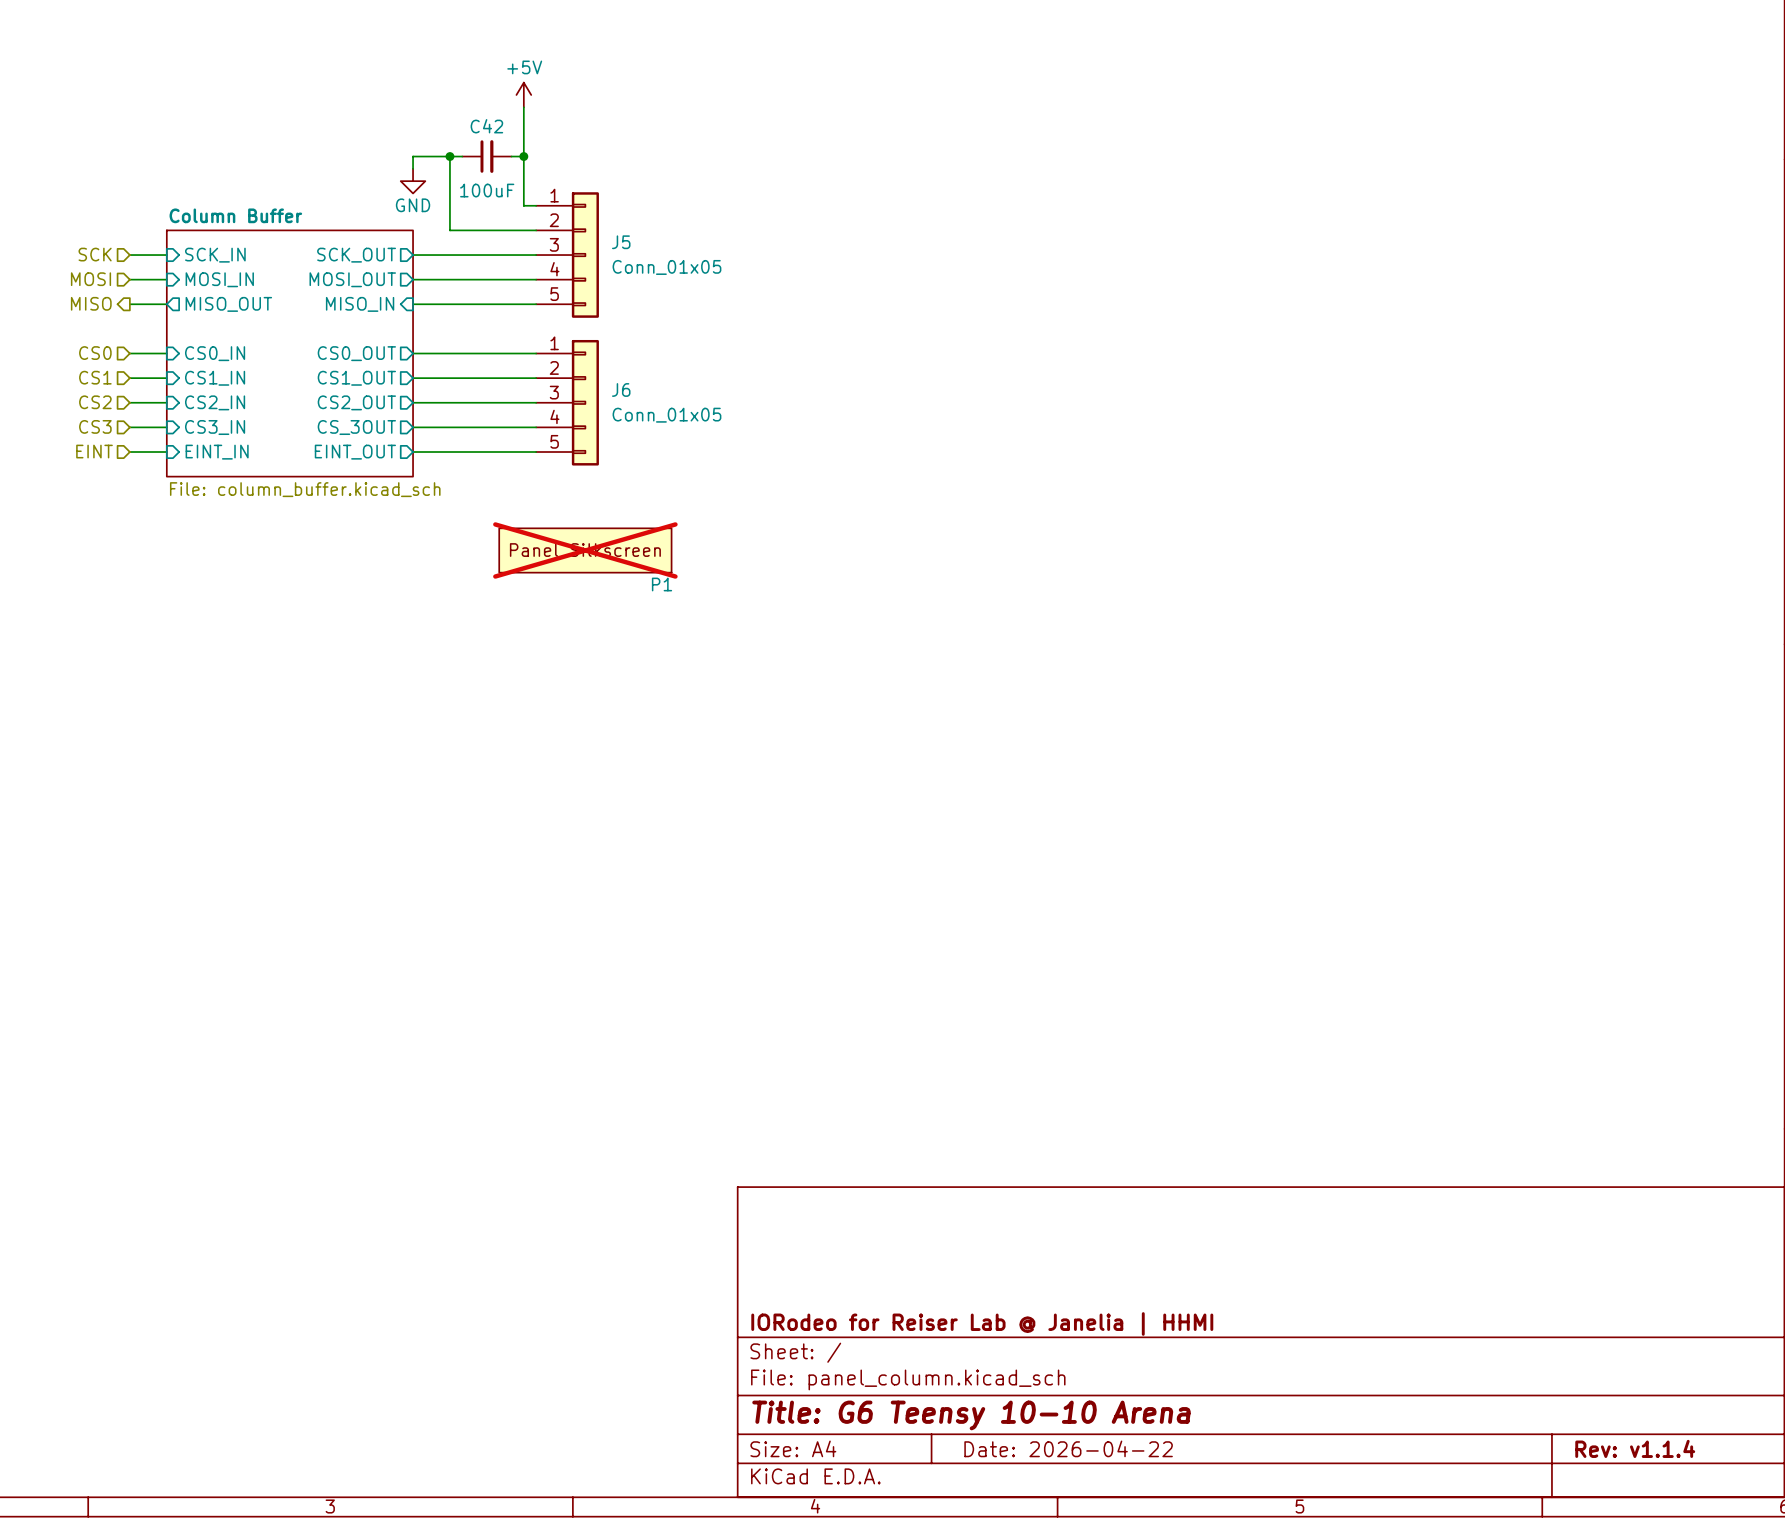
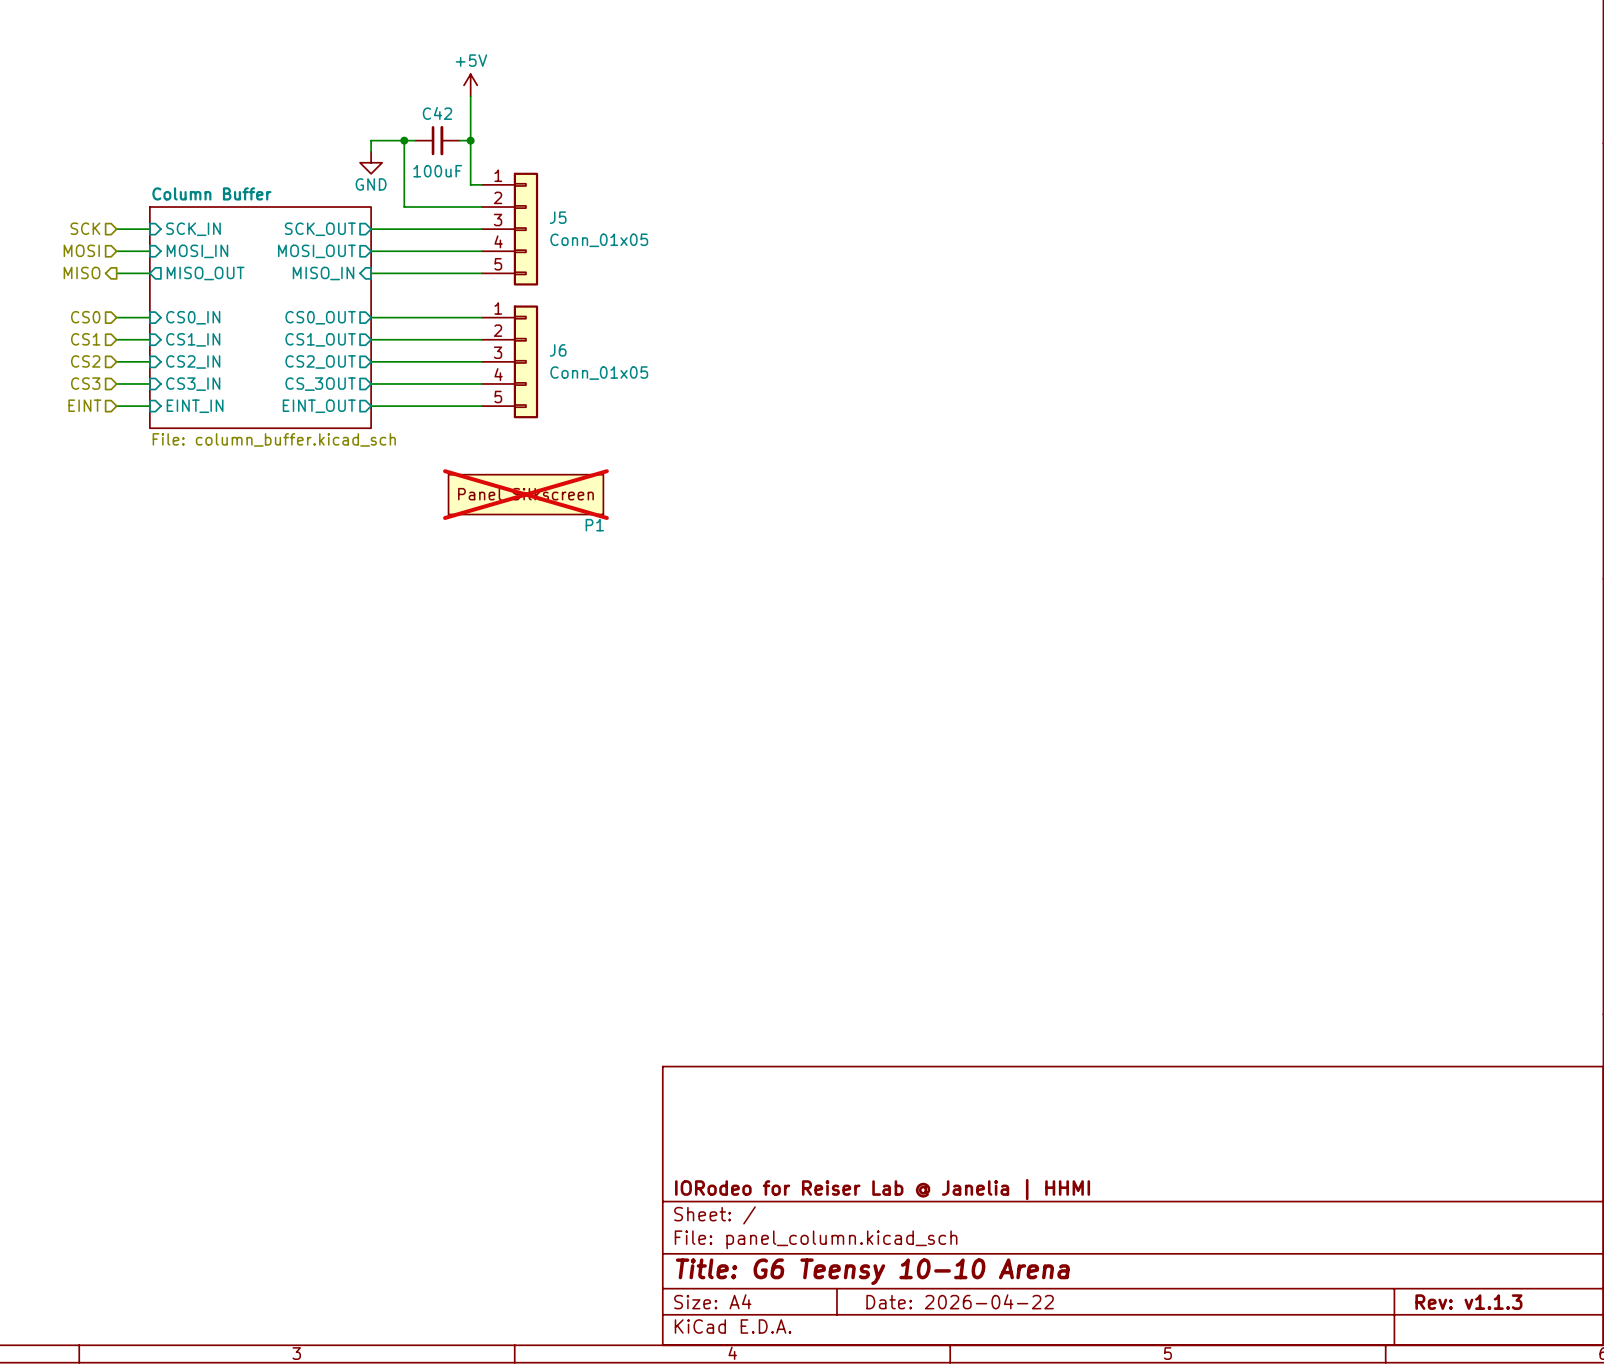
title block: Rev: v1.1.4 (1635, 1448) -> Rev: v1.1.3 (1468, 1302)

